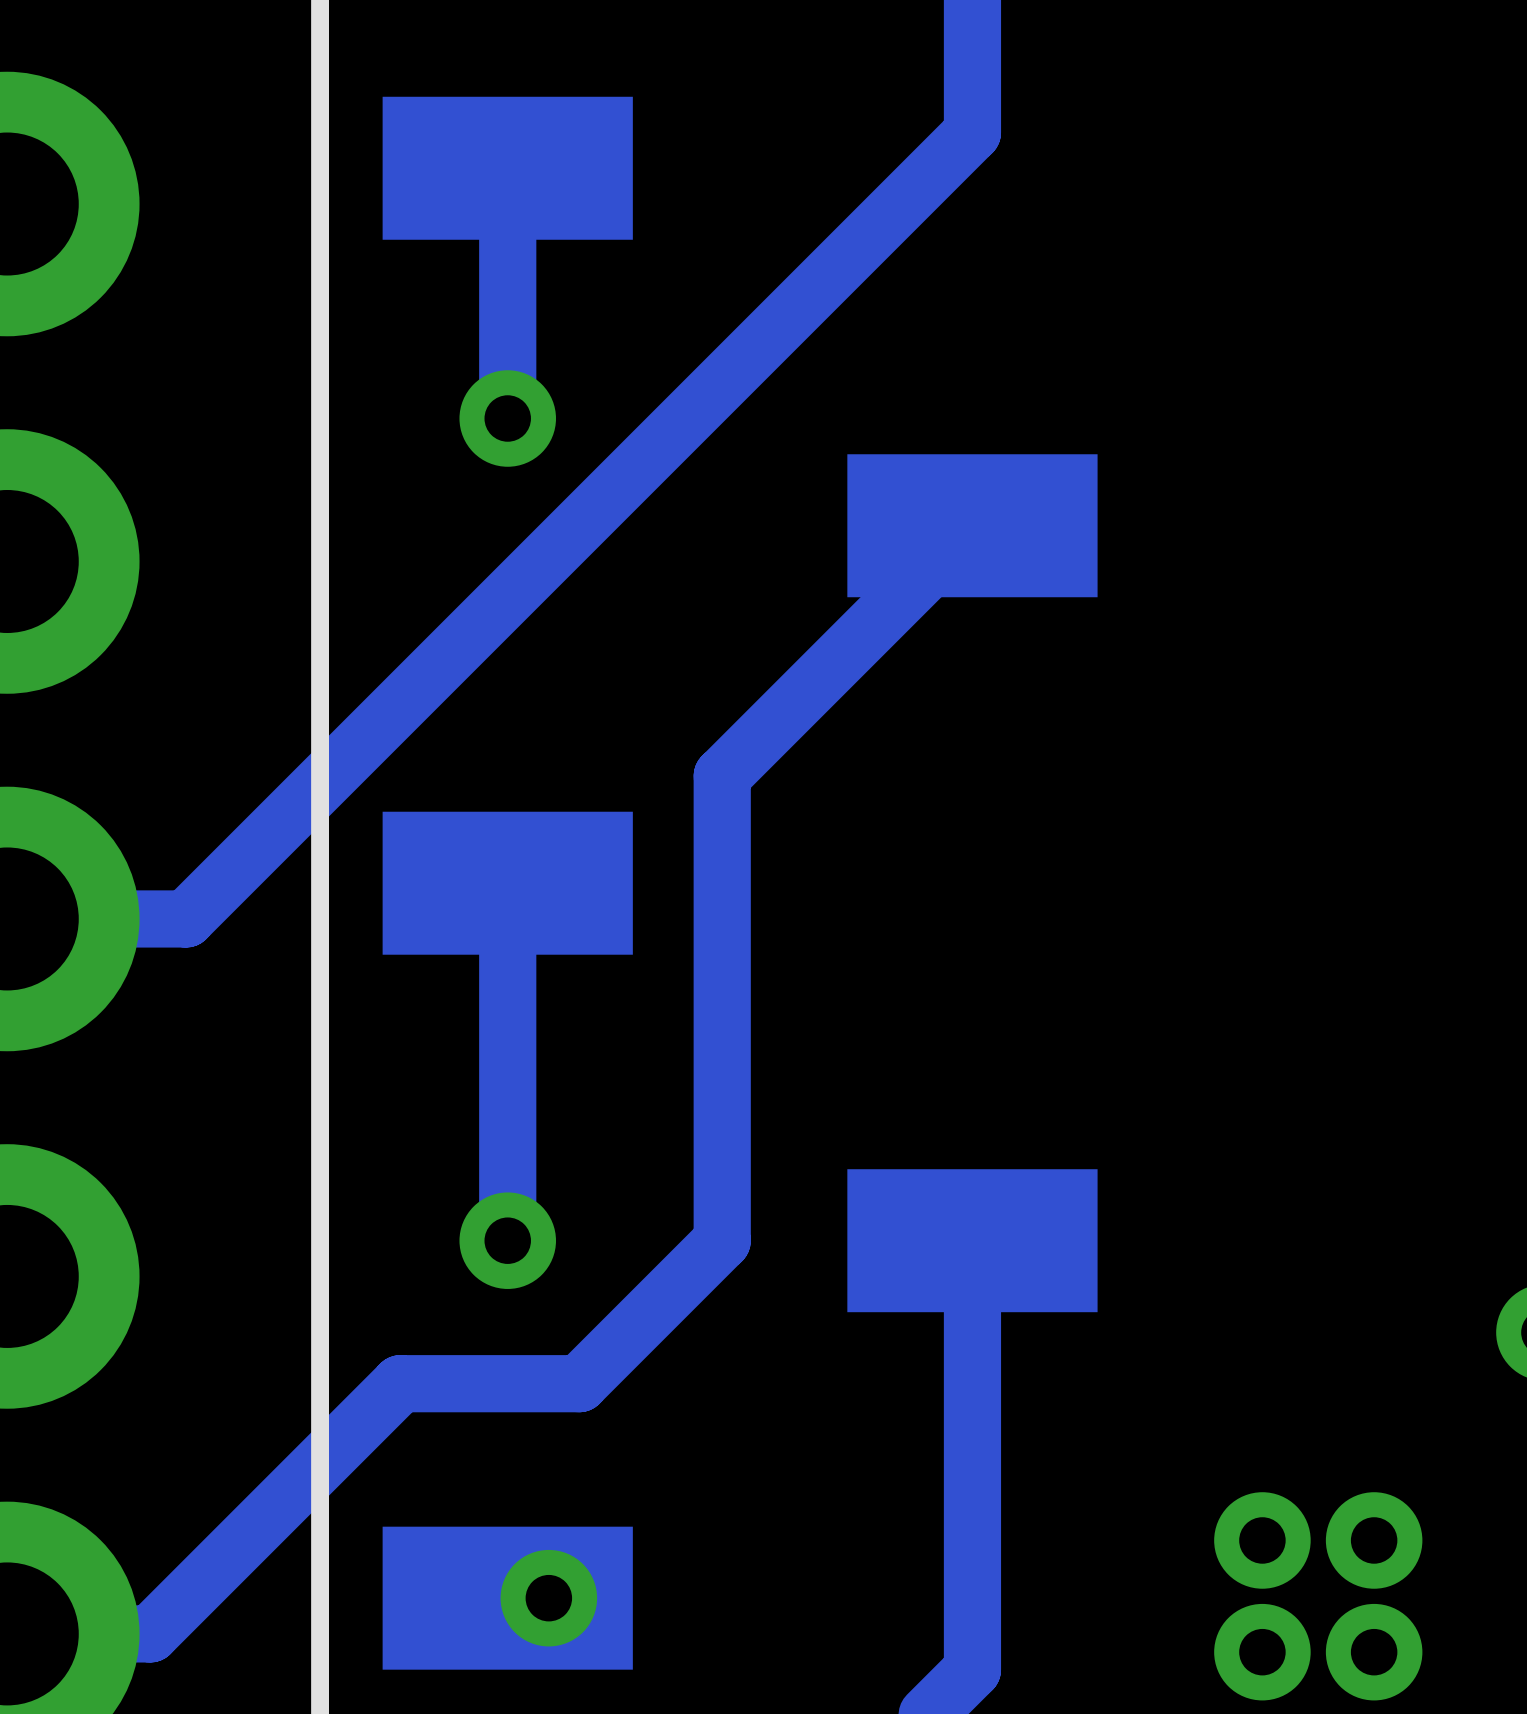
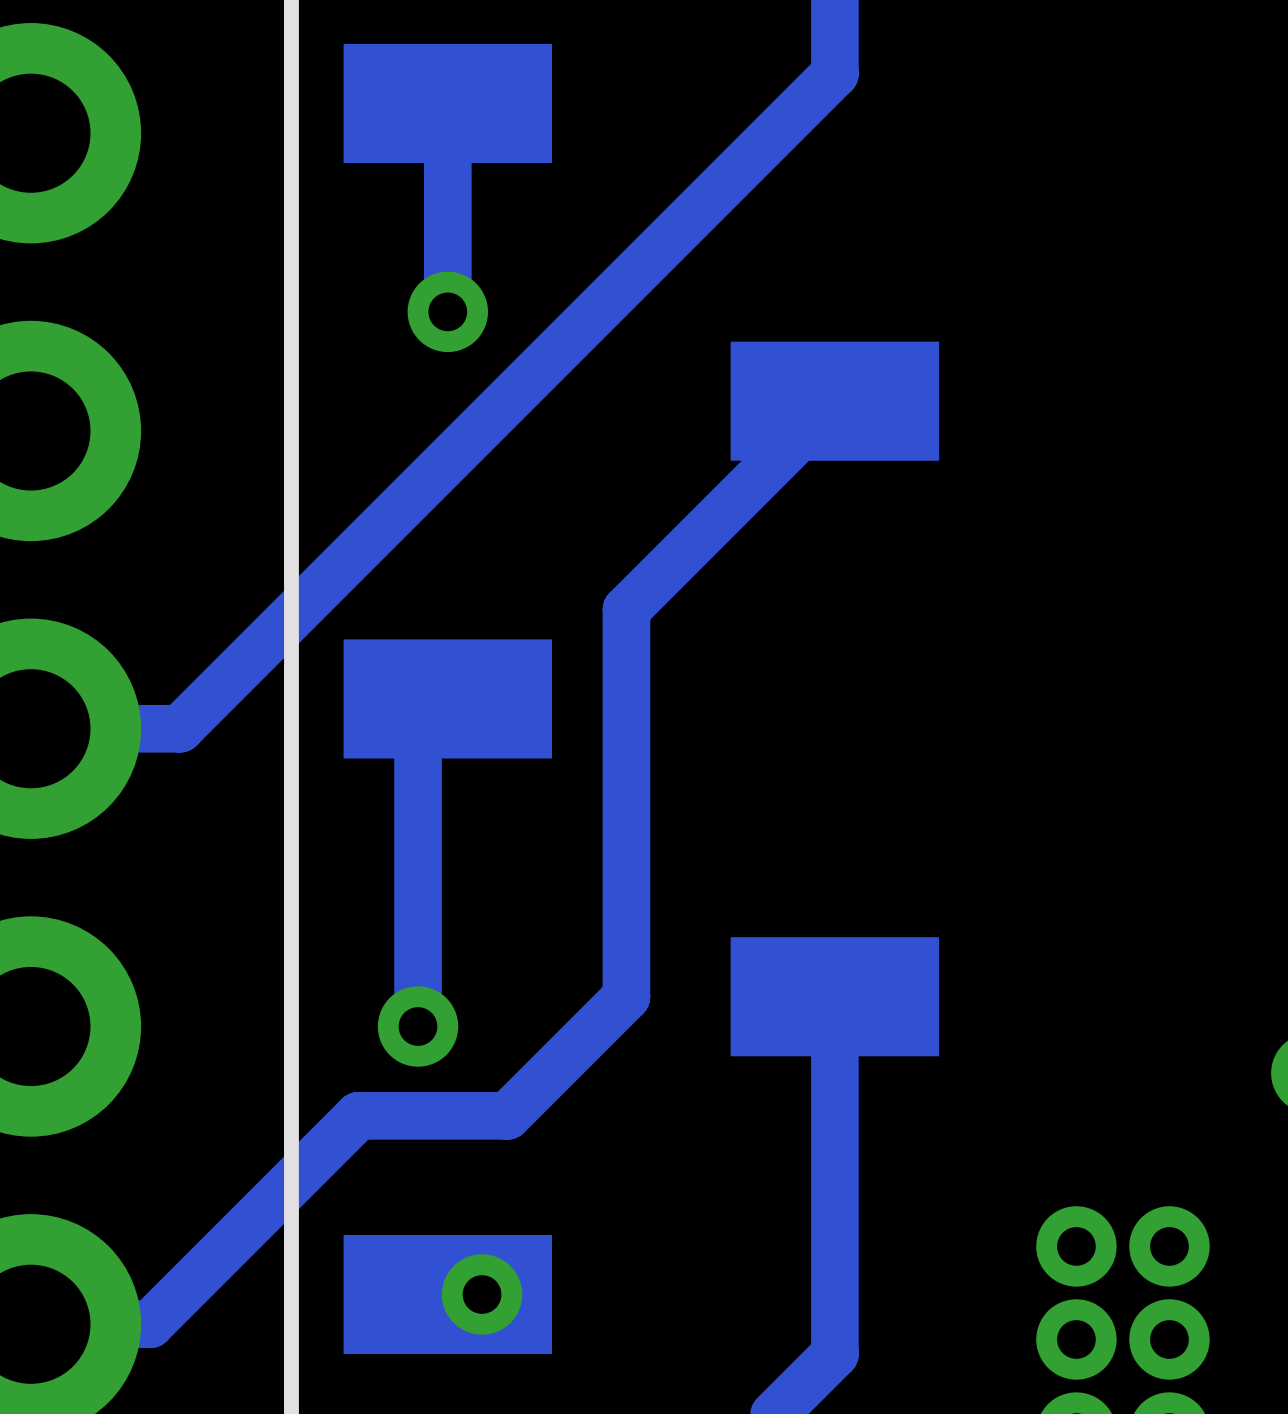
track: (507, 883) (507, 1240) -> (447, 698) (418, 728) (418, 1026)
via position: (507, 1240) -> (418, 1026)

